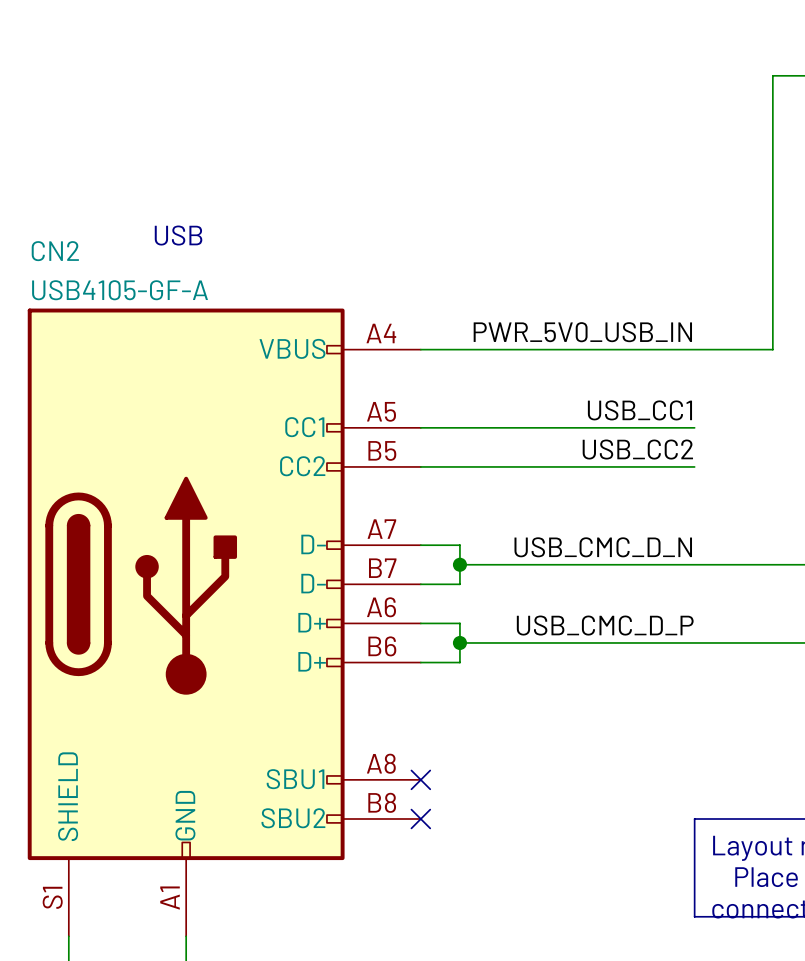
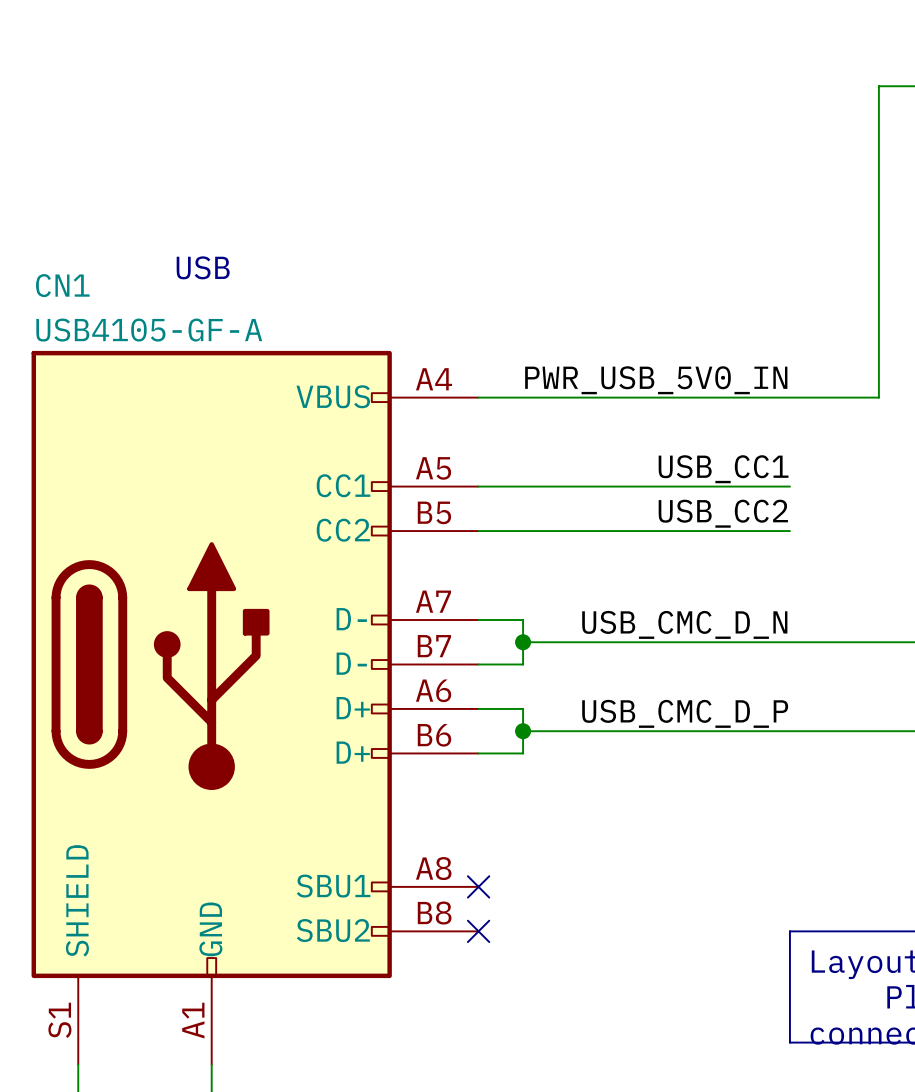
CN2 name: CN2 (55, 251) -> CN1 (62, 285)
label: PWR_5V0_USB_IN (582, 332) -> PWR_USB_5V0_IN (656, 380)

